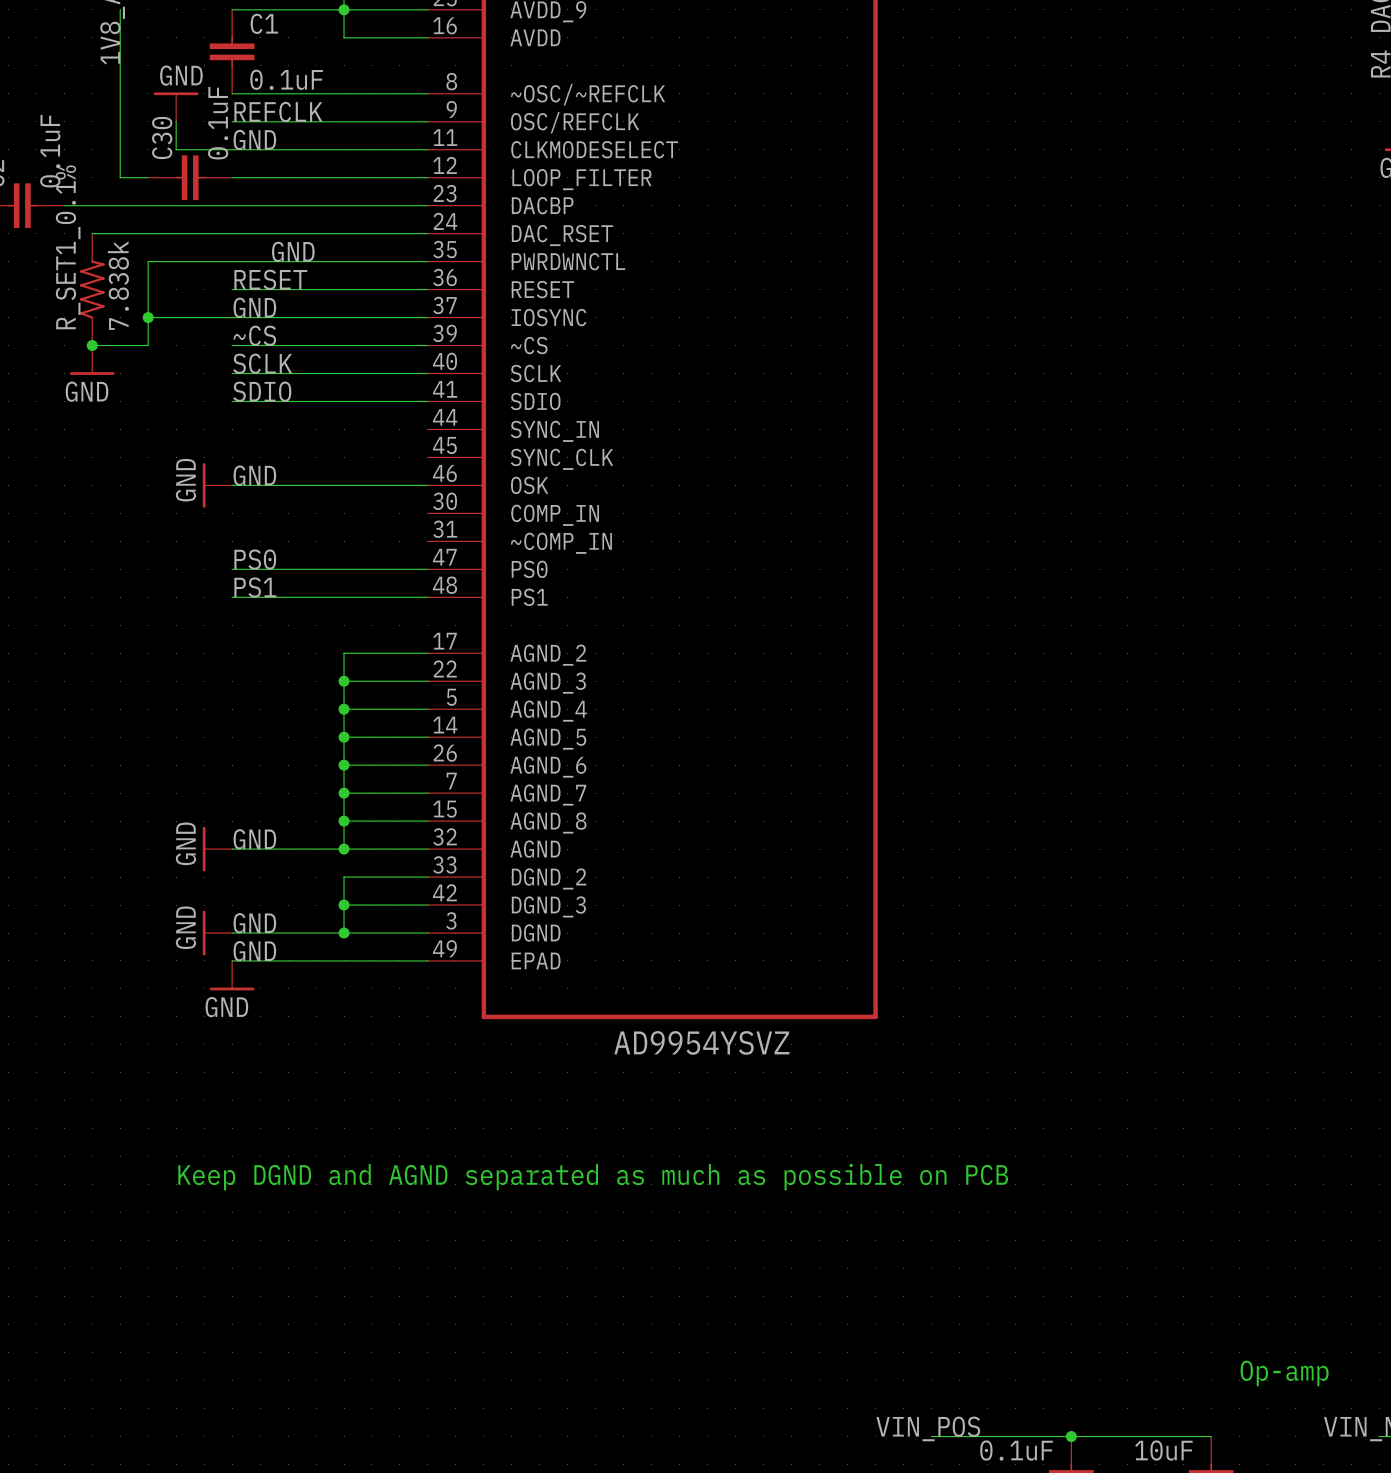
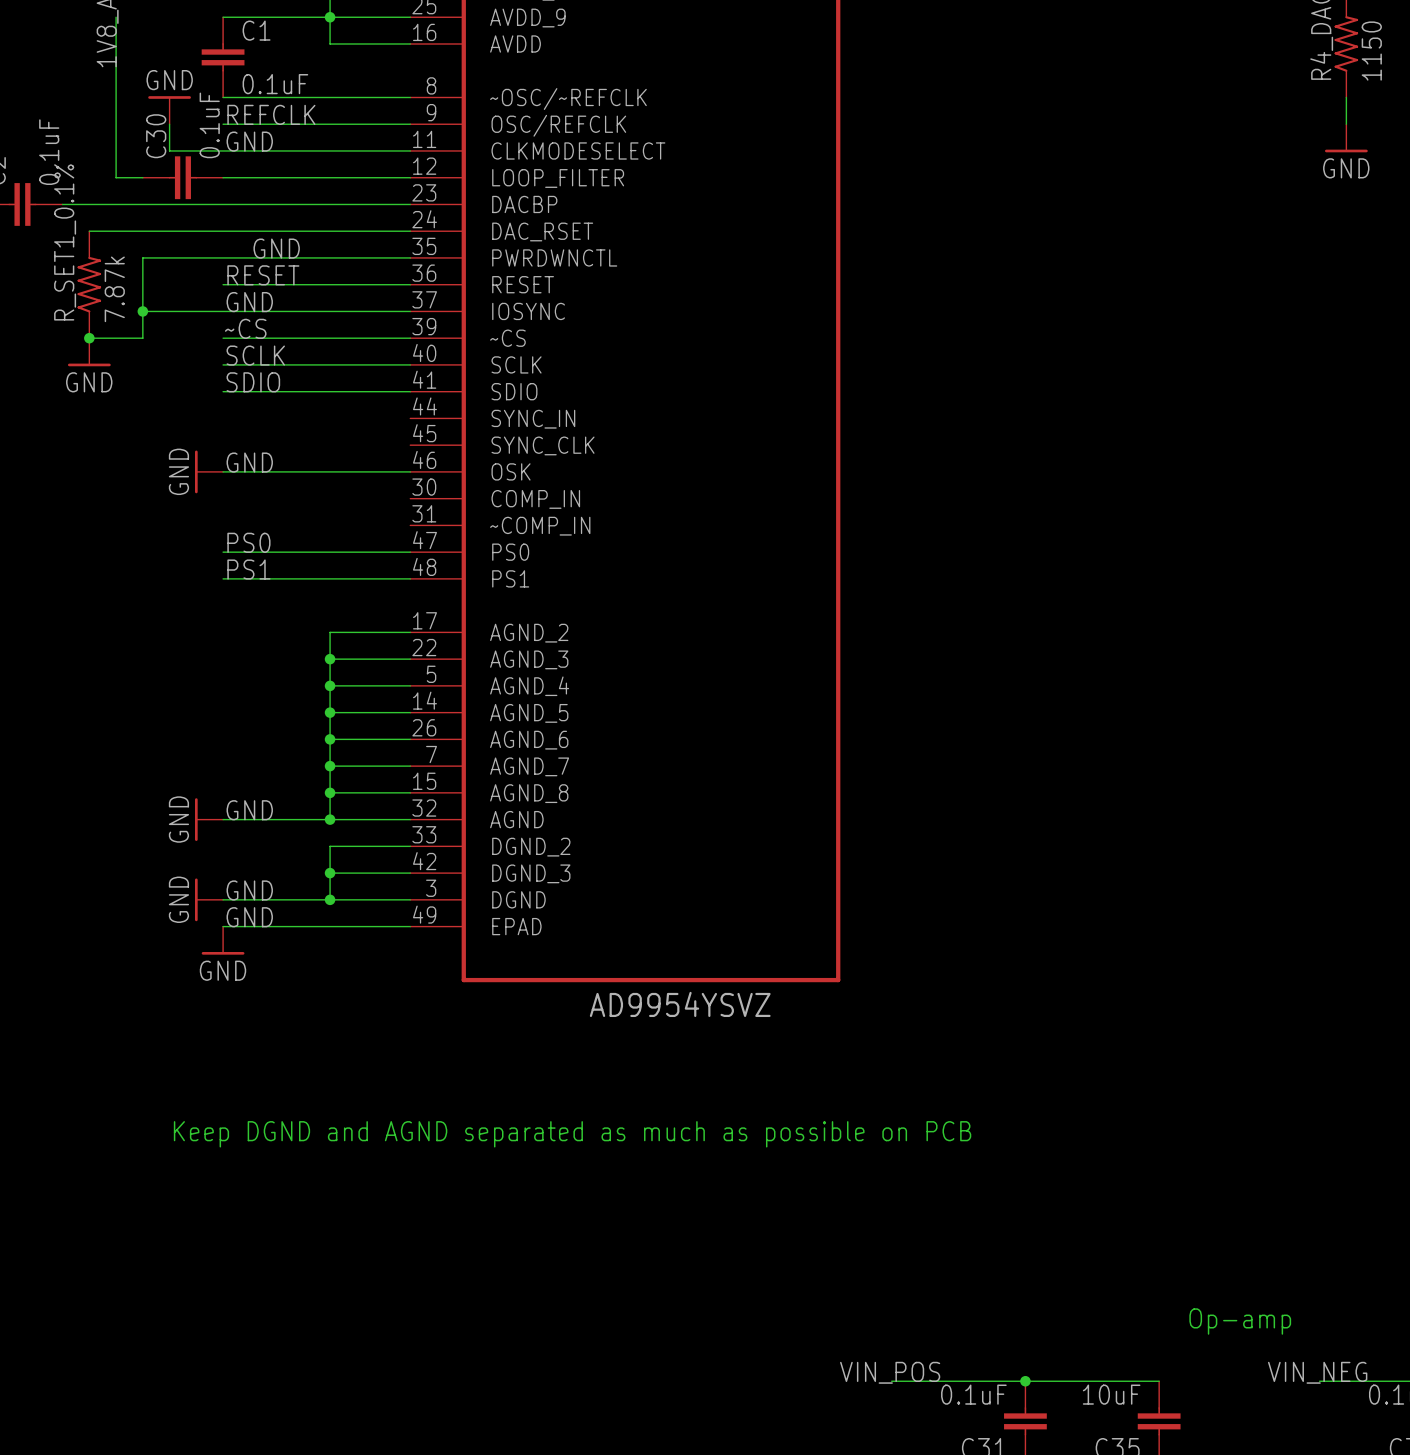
R_SET1_0.1% value: 7.838k (118, 285) -> 7.87k (114, 289)

